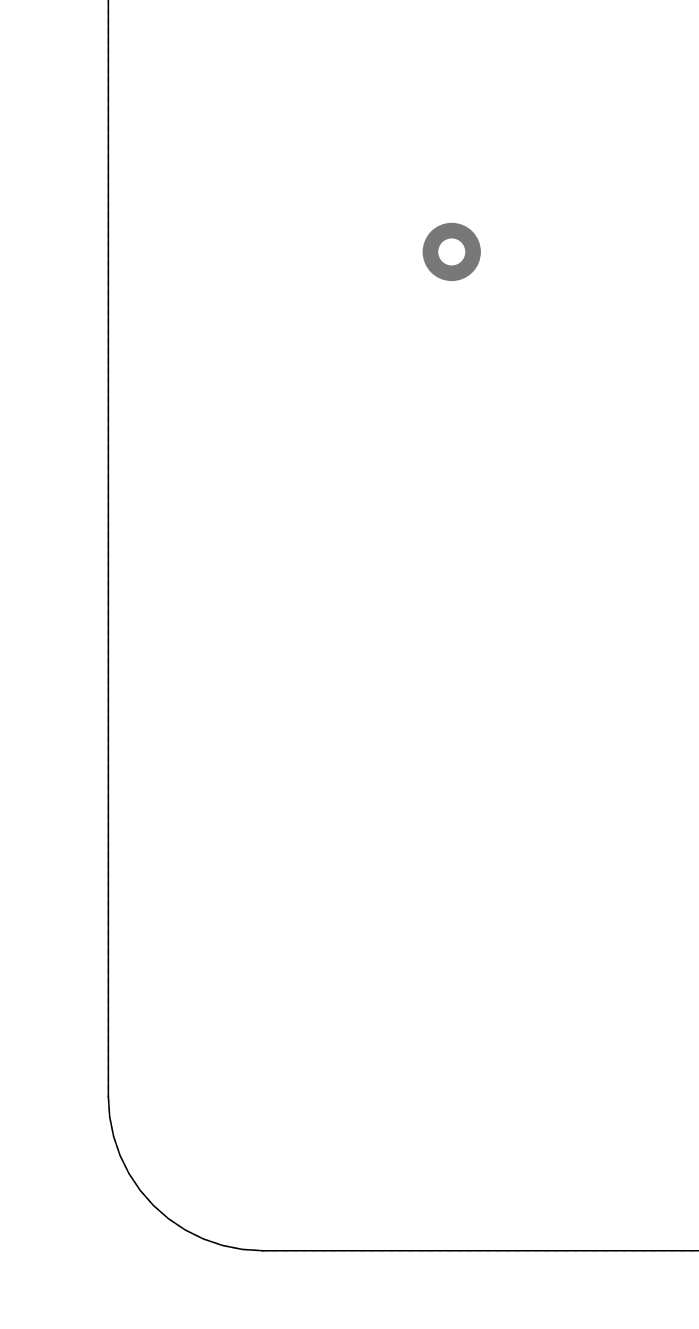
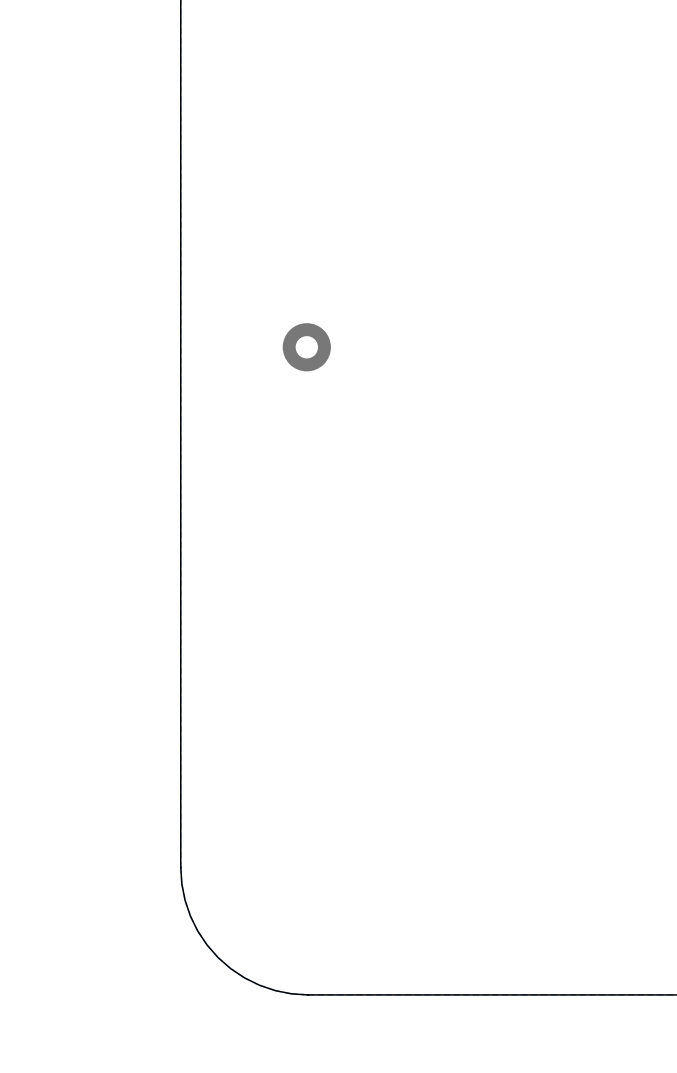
via: (451, 251) -> none
via: none -> (306, 347)

